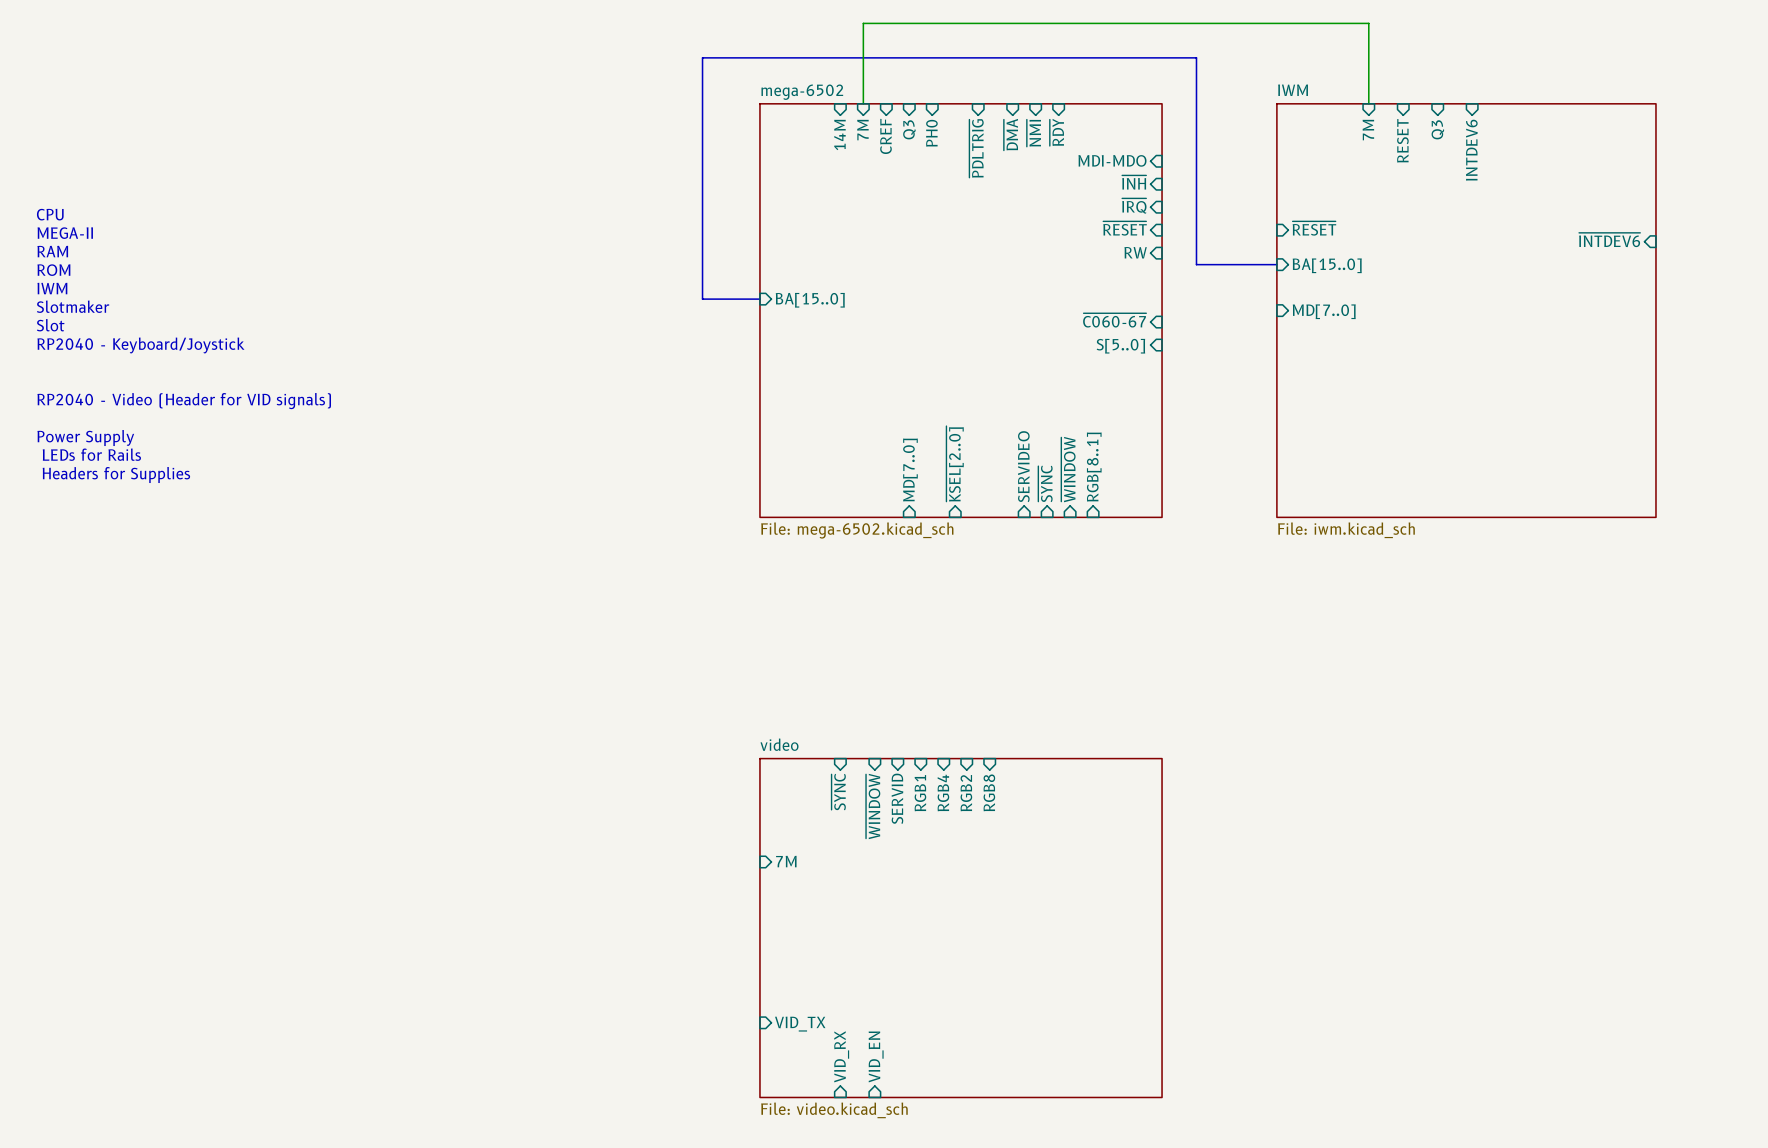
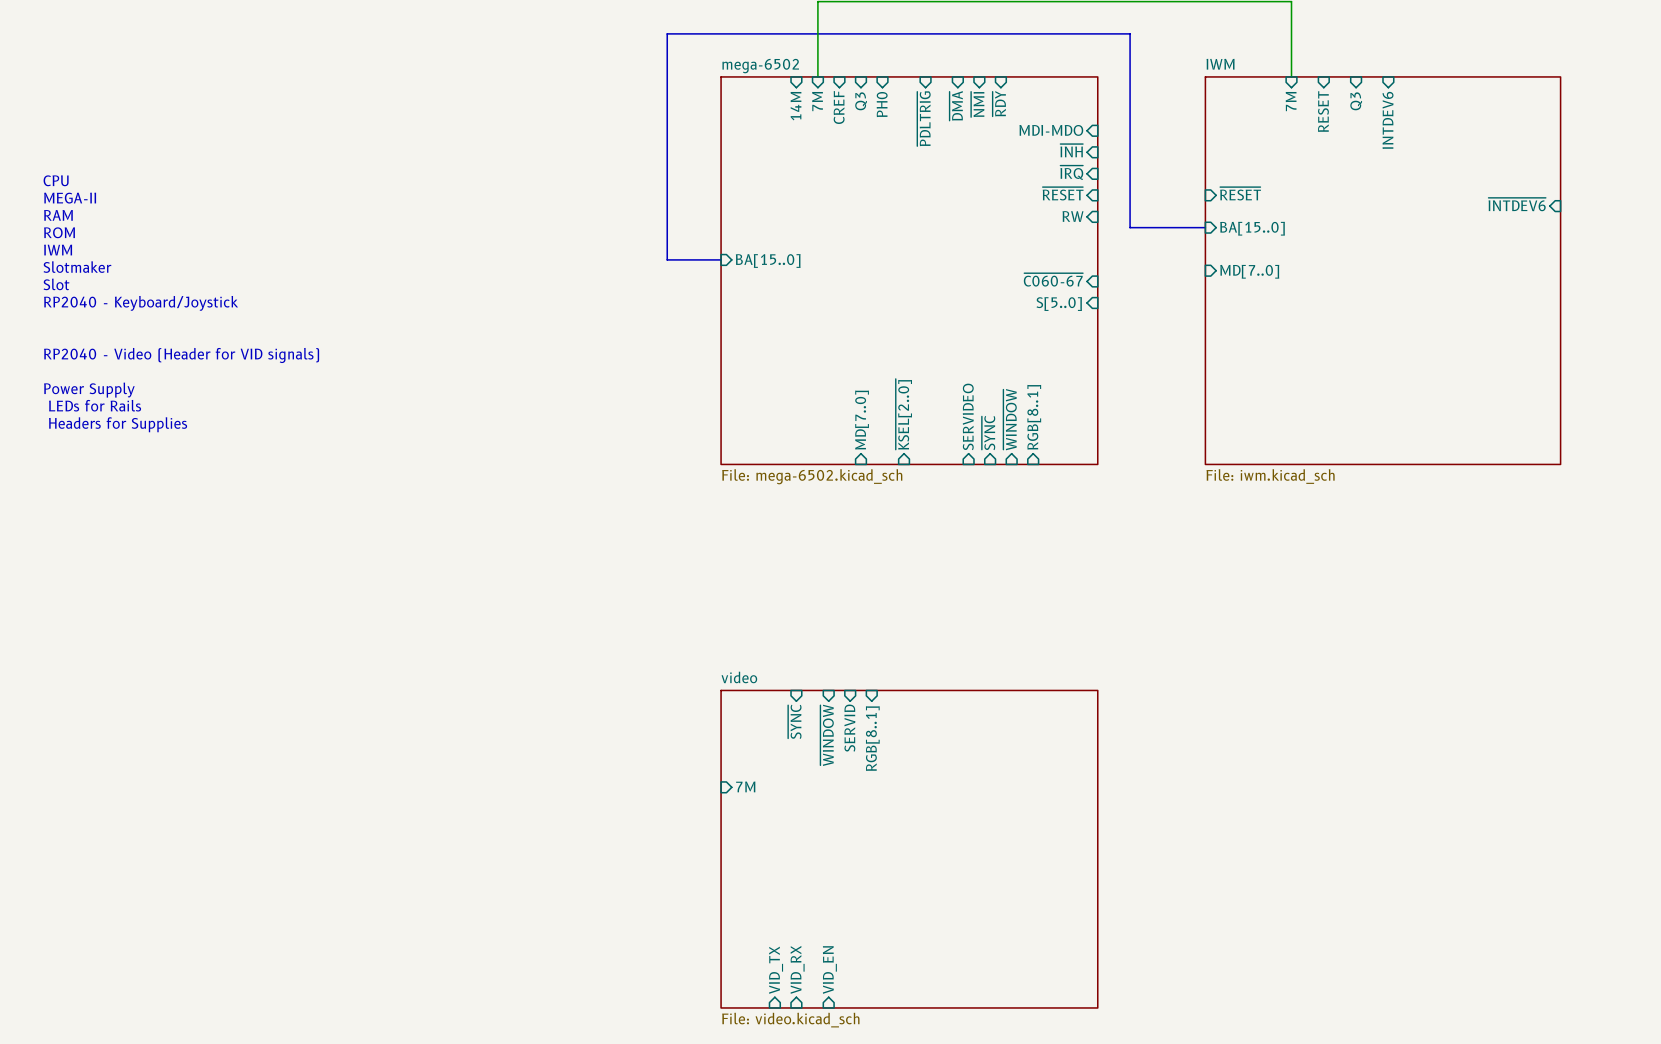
sheet pin: RGB8 (989, 792) -> none
sheet pin: RGB1 (920, 793) -> RGB[8..1] (872, 738)
sheet pin: RGB4 (943, 793) -> none
sheet pin: RGB2 (966, 793) -> none
sheet pin rotation: 0° (800, 1024) -> 90° counterclockwise (776, 970)

